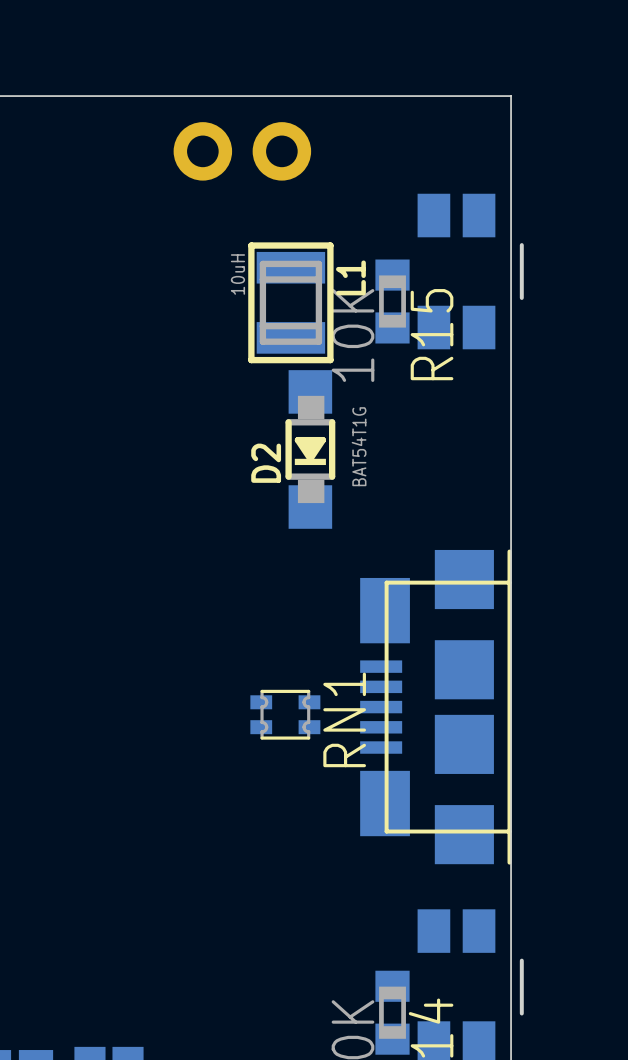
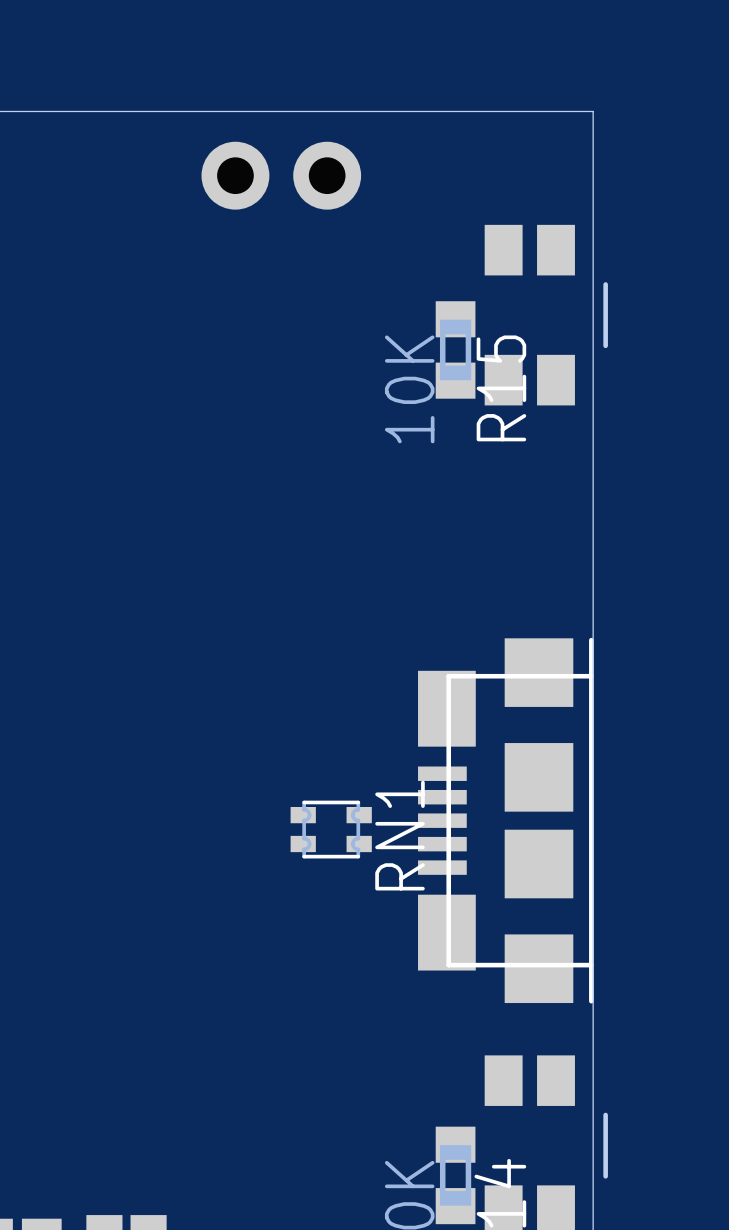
L1: 10uH (290, 302) -> none
D2: BAT54T1G (310, 449) -> none

